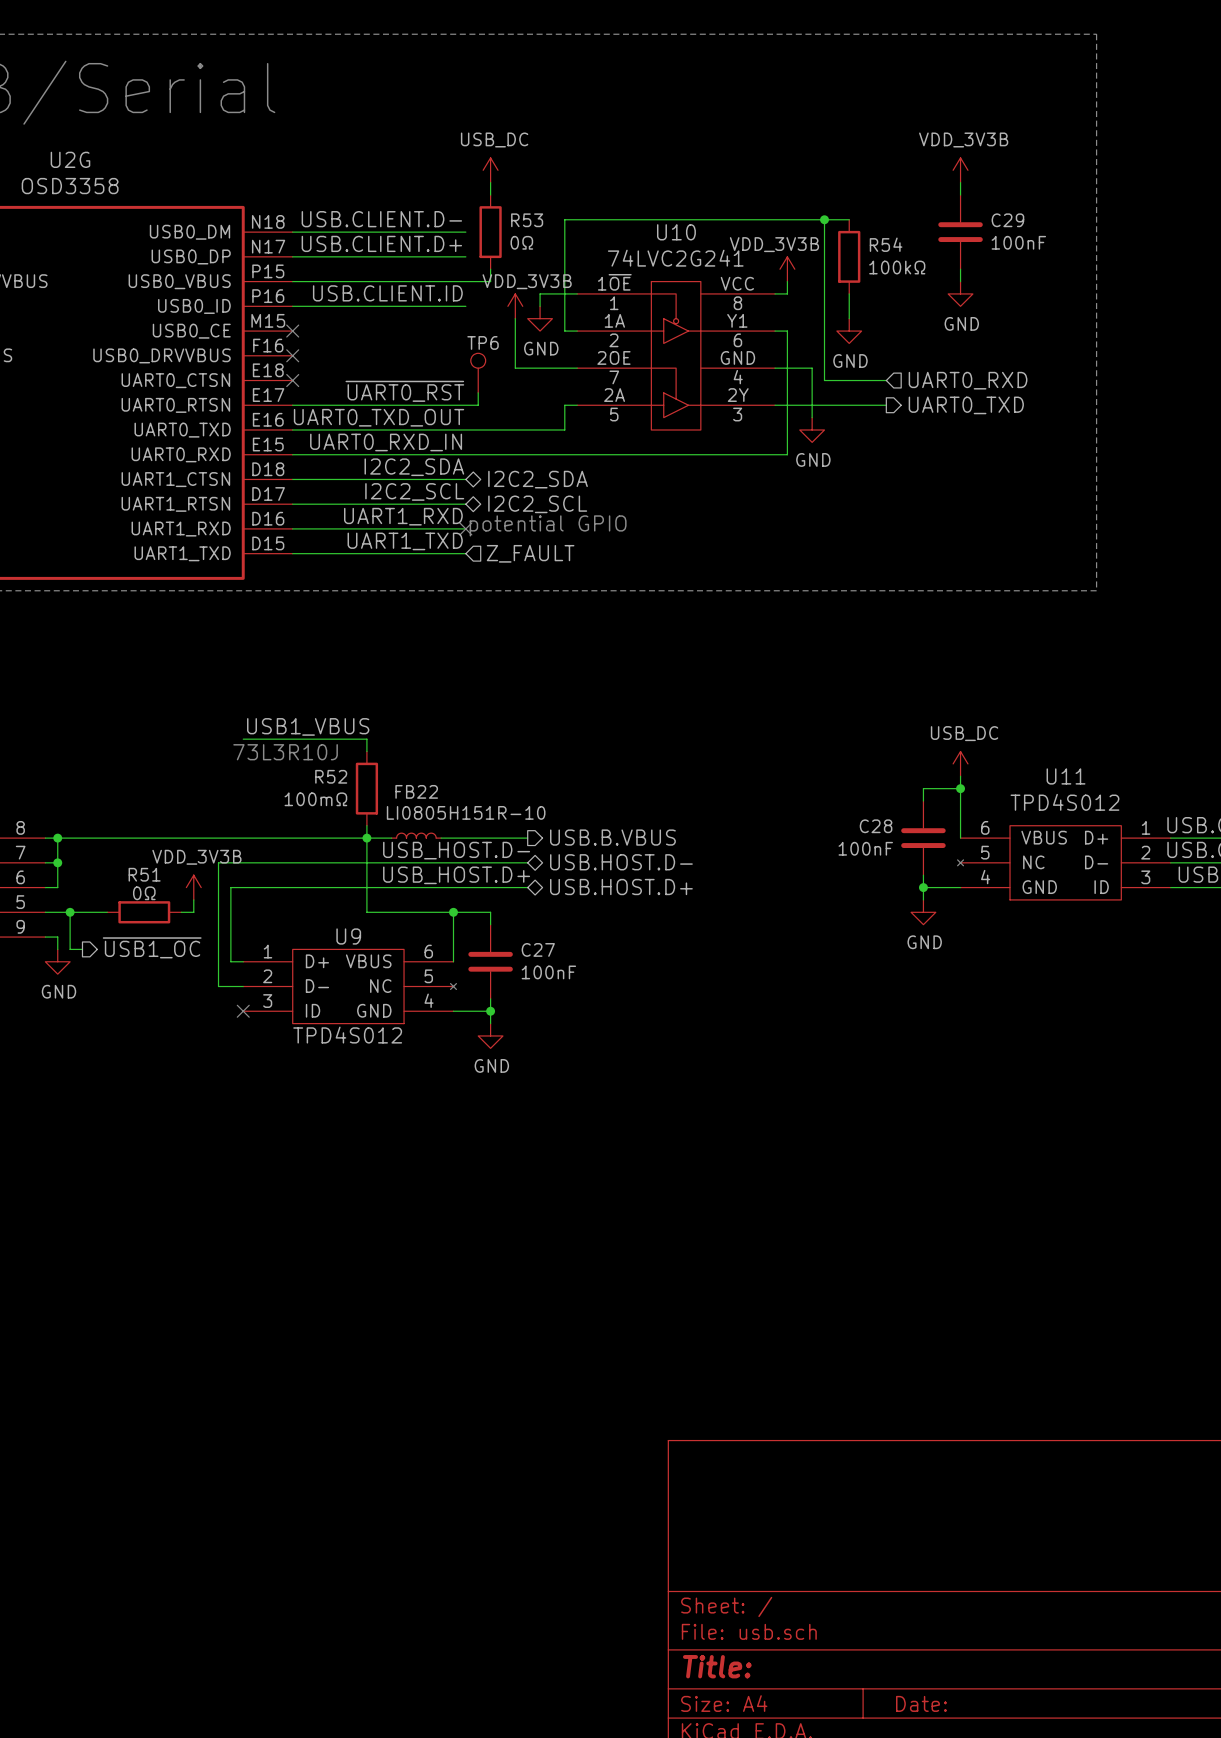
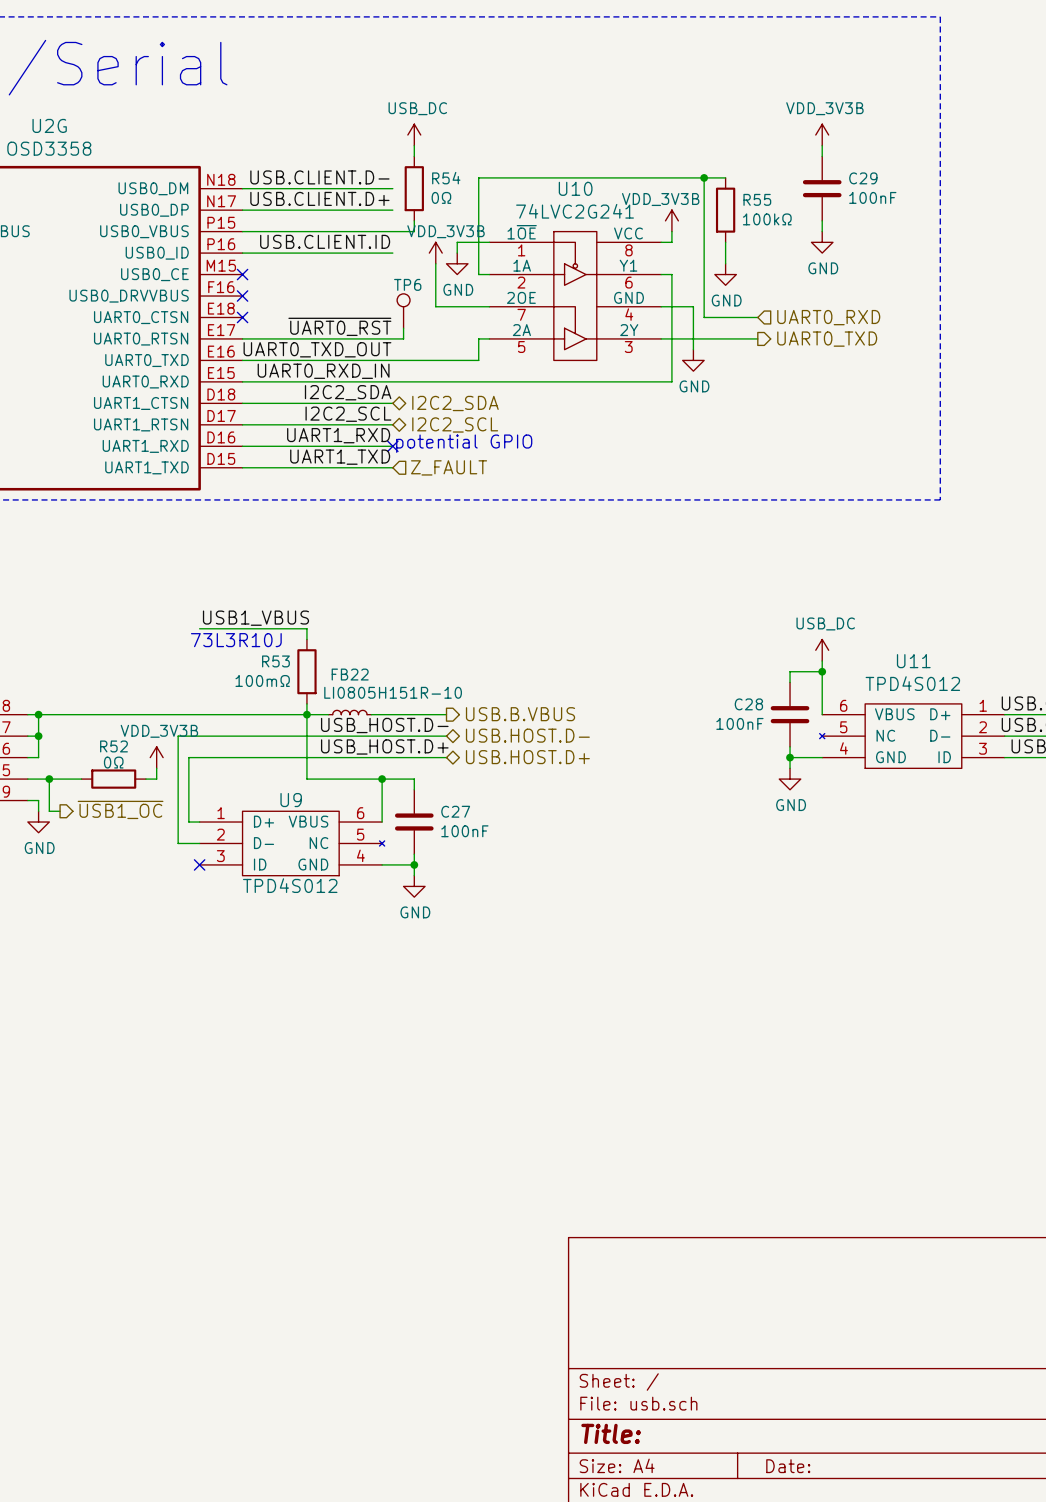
R53 name: R53 (527, 220) -> R54 (446, 178)
R54 name: R54 (886, 244) -> R55 (757, 199)
R52 name: R52 (331, 776) -> R53 (275, 661)
R51 name: R51 (144, 874) -> R52 (113, 746)

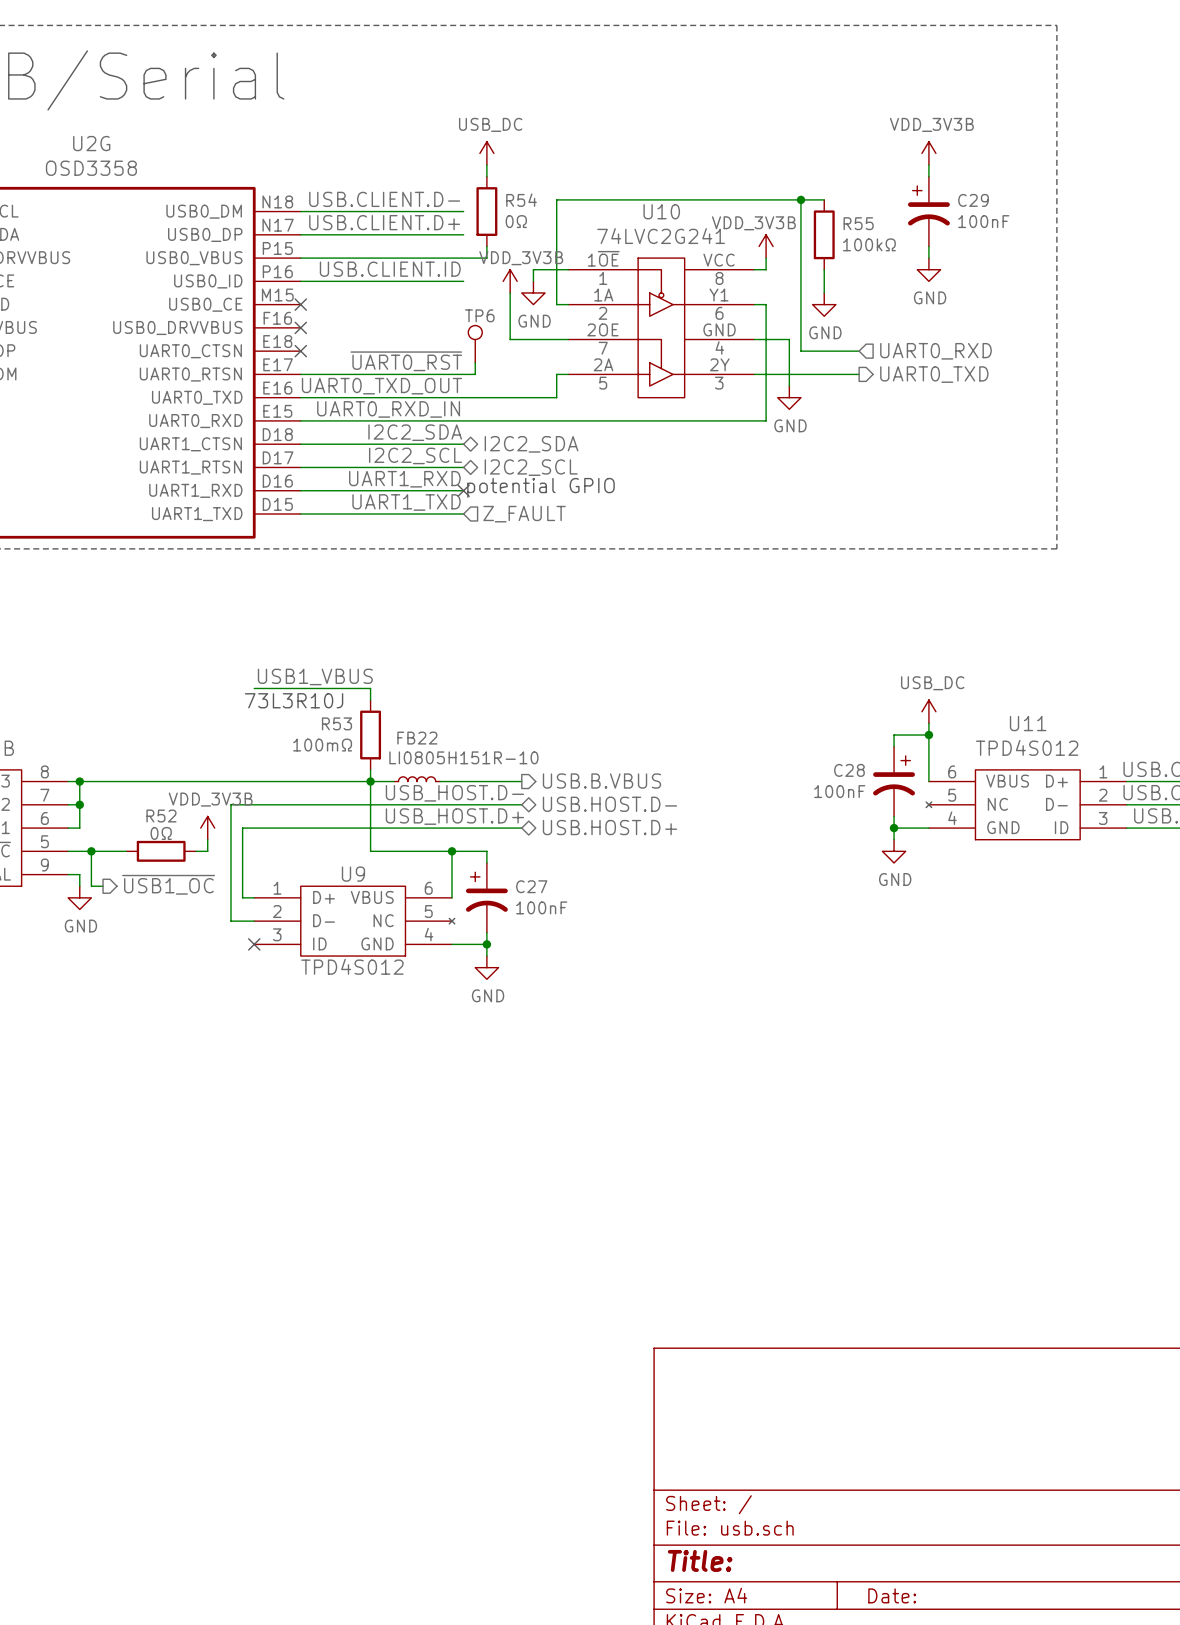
C29 symbol: [802, 156, 842, 221] -> [907, 176, 950, 247]
C28 symbol: [770, 682, 810, 747] -> [873, 746, 915, 817]
C27 symbol: [394, 789, 434, 855] -> [465, 862, 508, 933]

